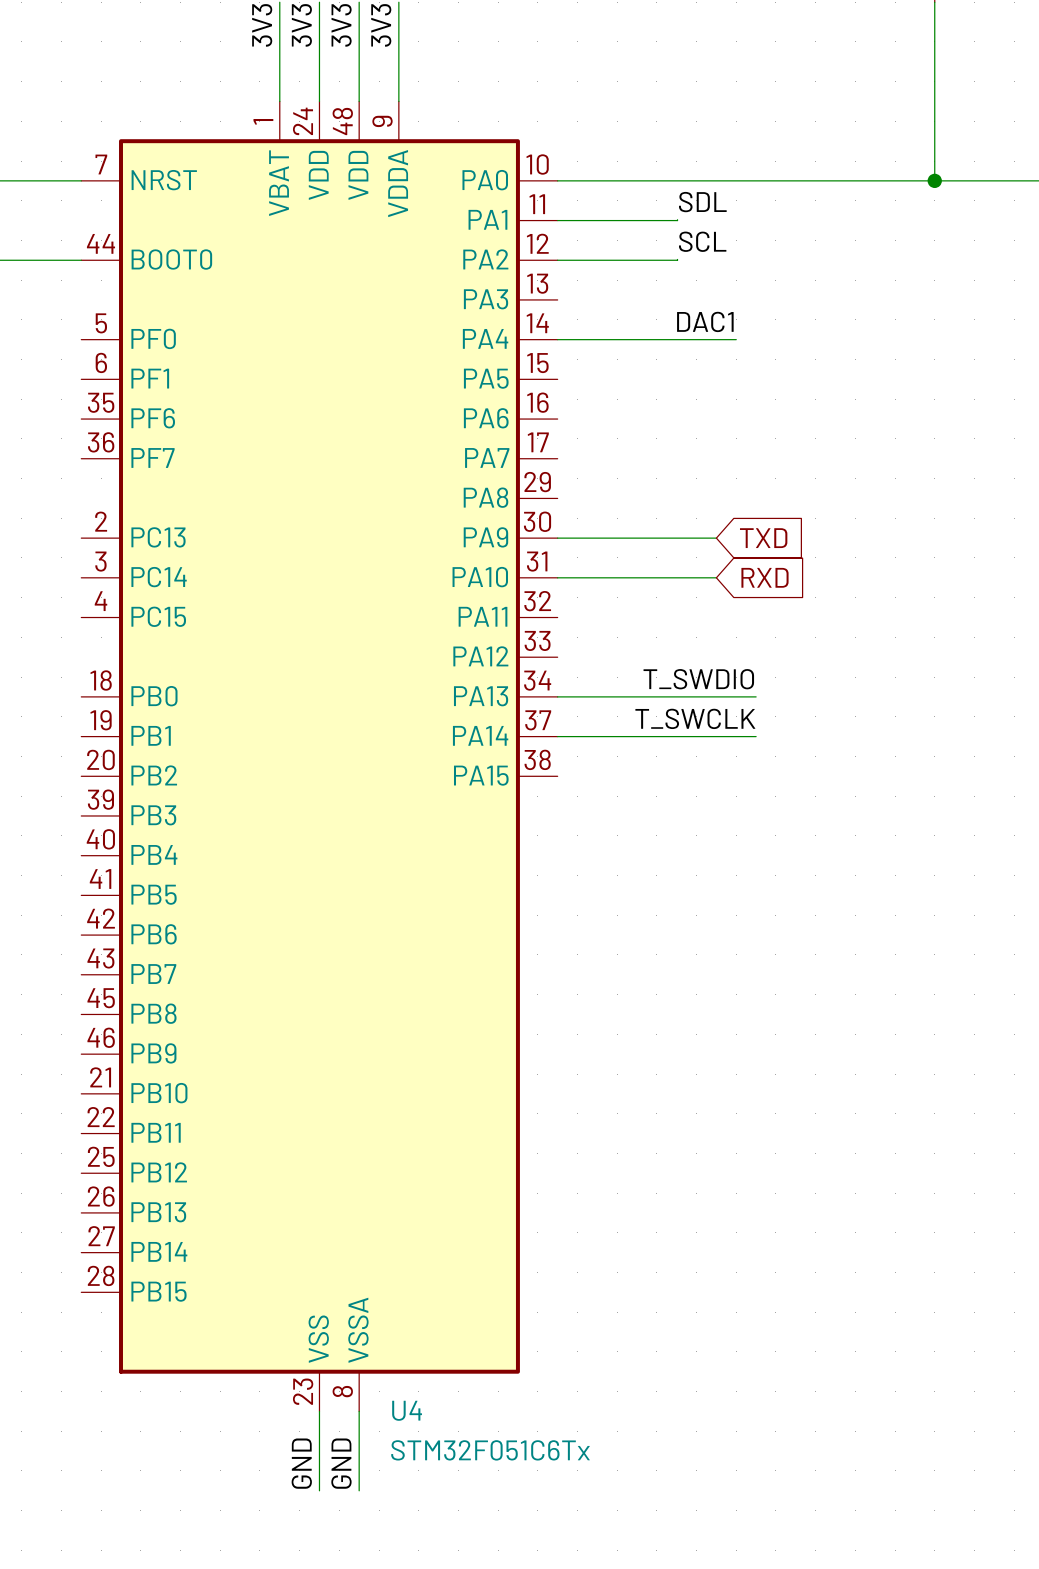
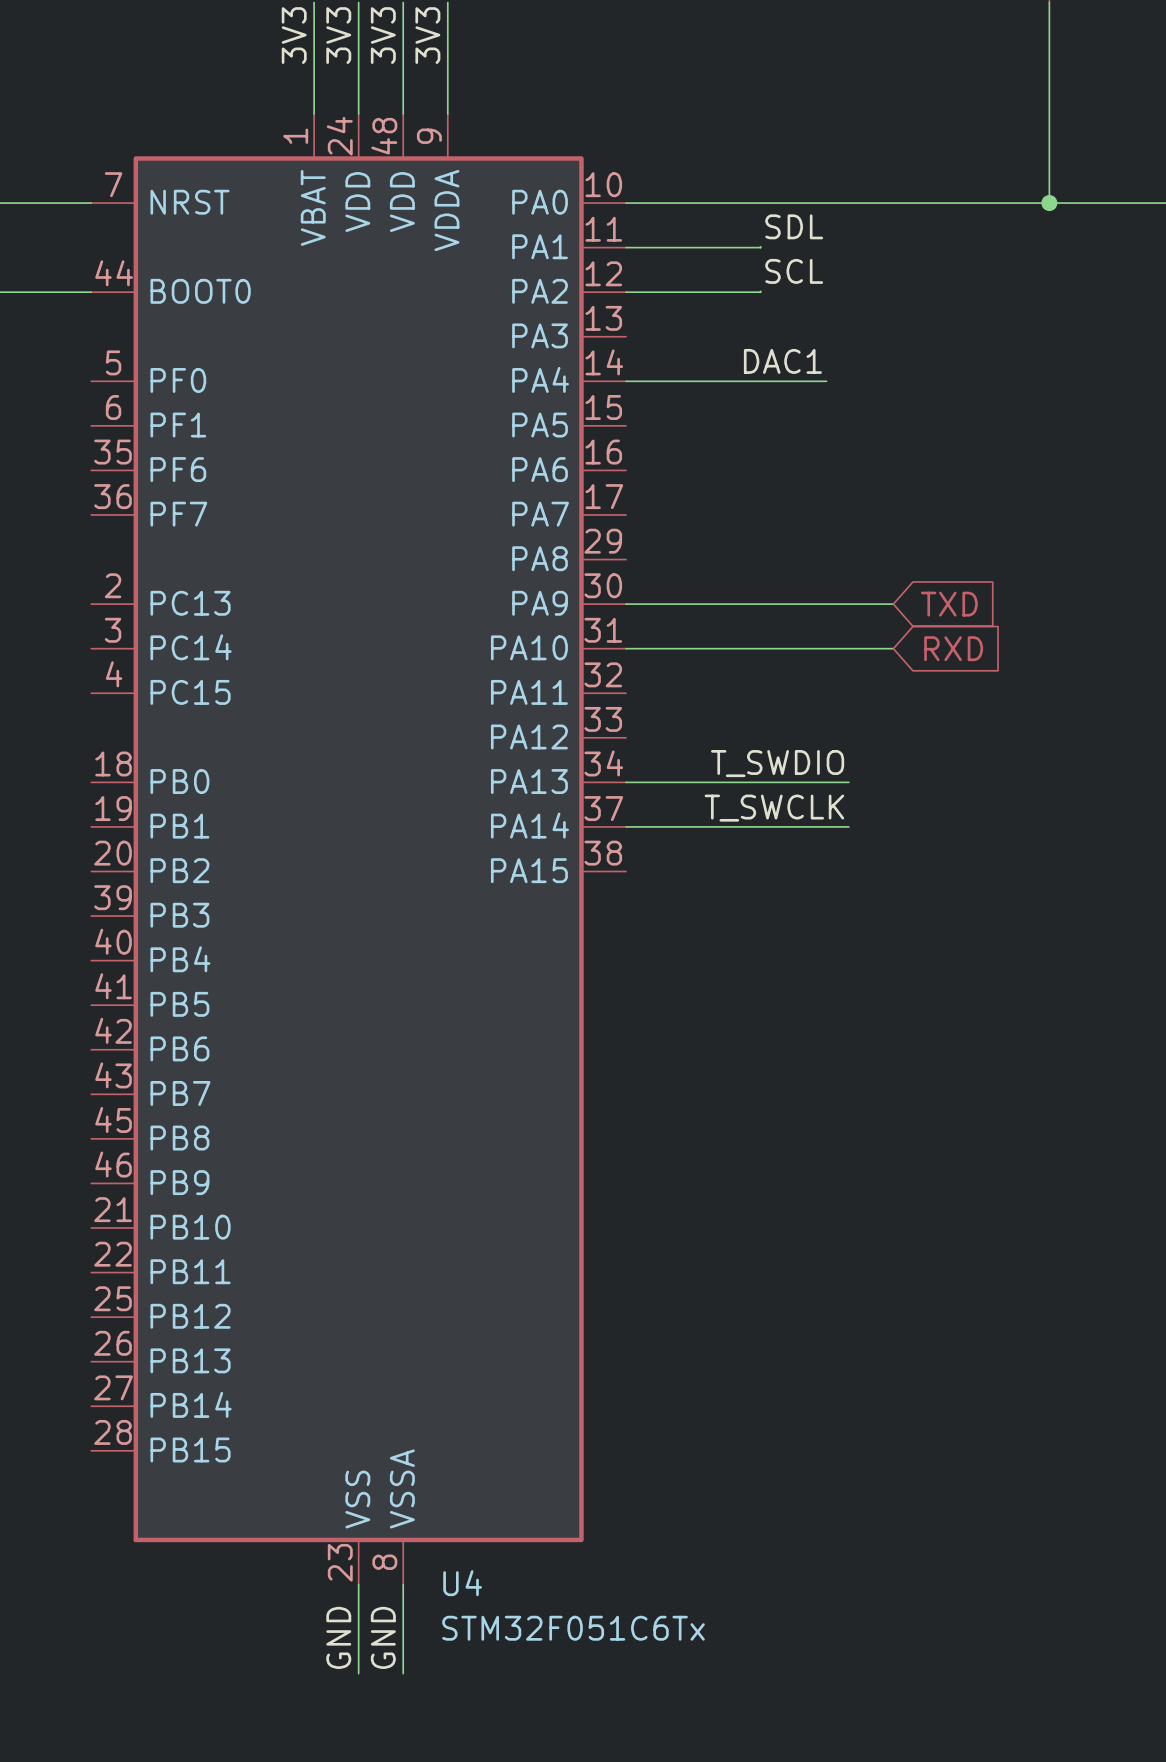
wire: none -> (804, 604) (893, 604)
global label position: TXD (763, 538) -> TXD (949, 604)
wire: none -> (804, 648) (893, 648)
global label position: RXD (764, 577) -> RXD (953, 648)

